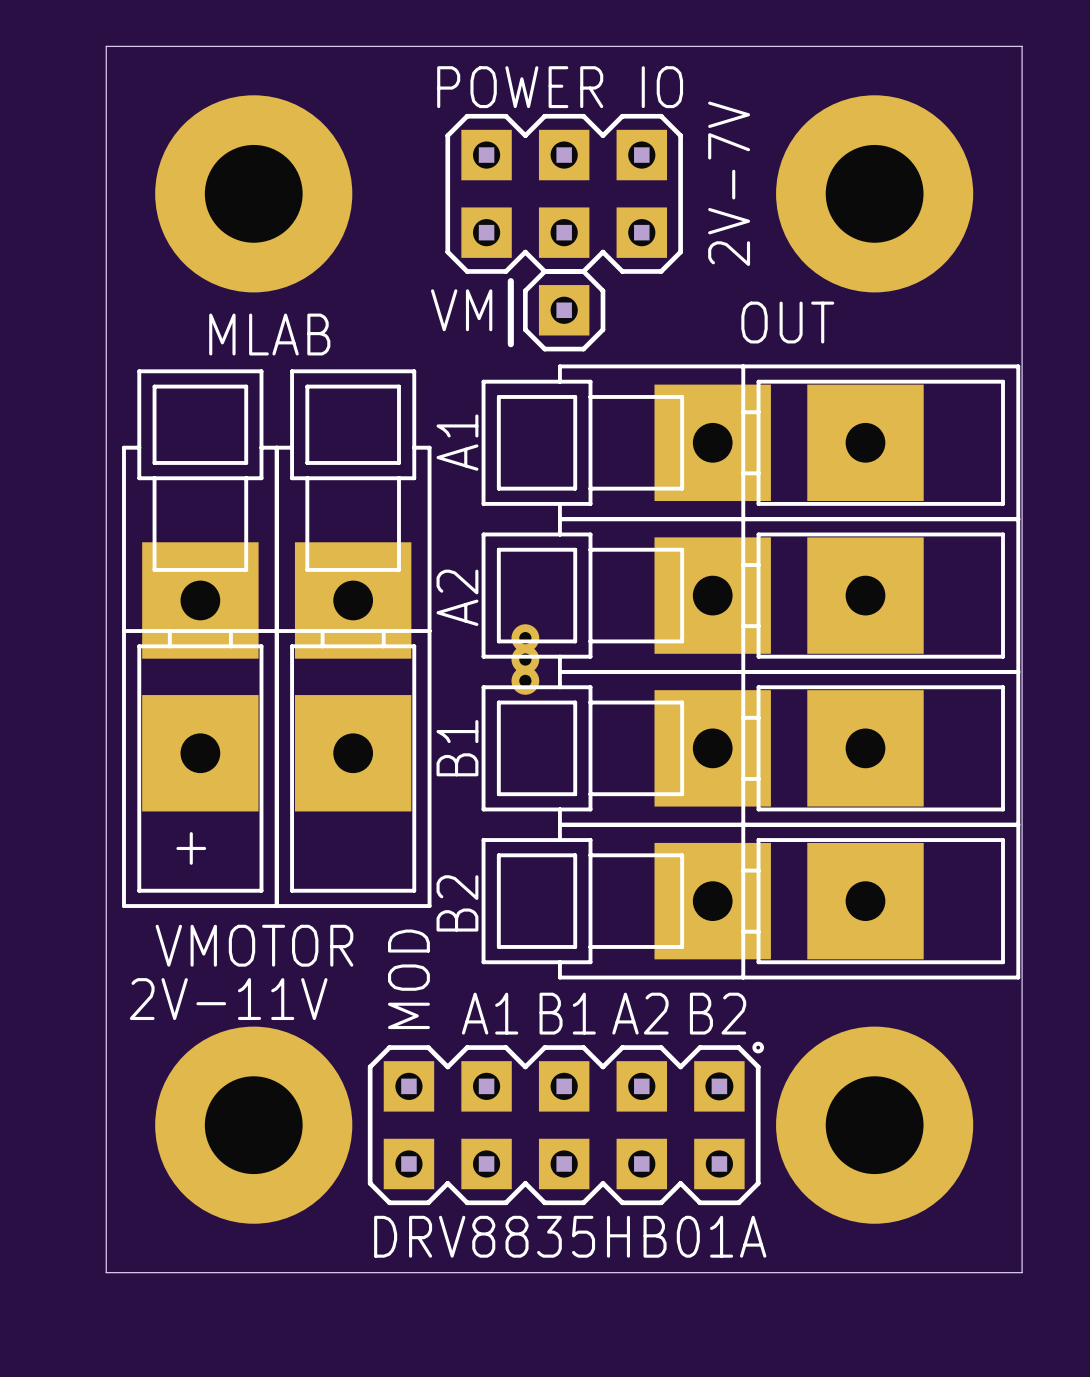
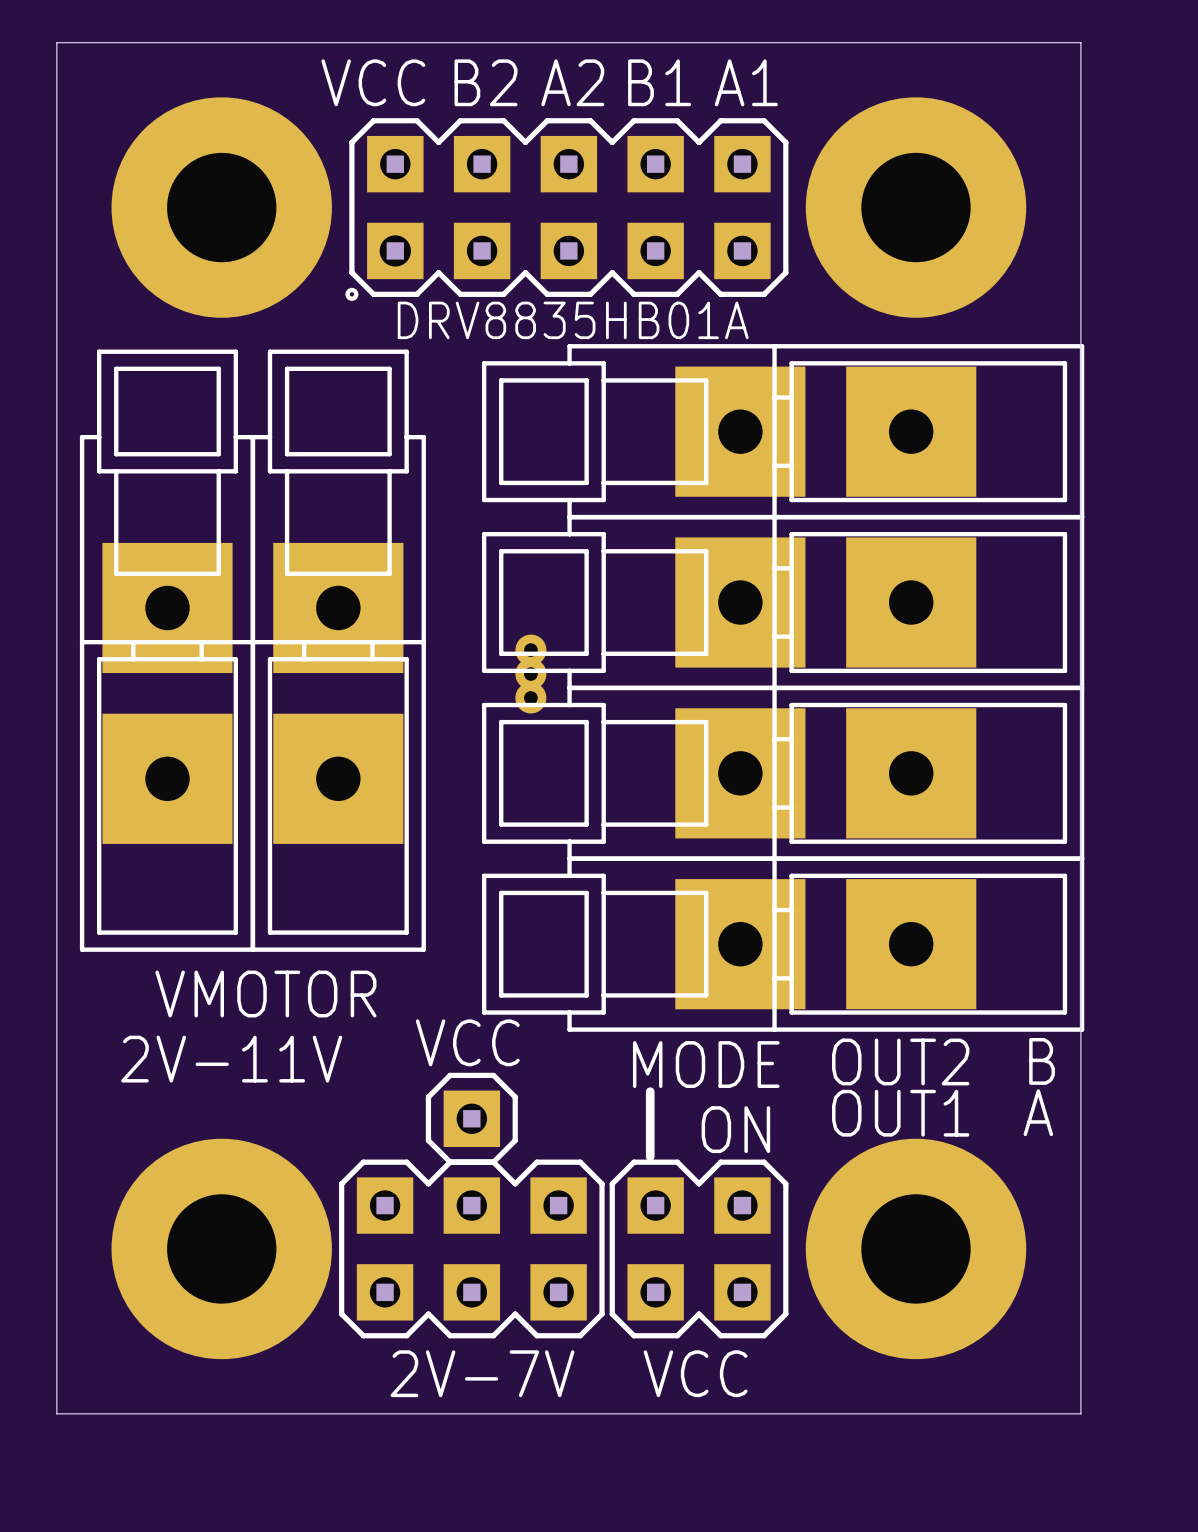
text: none -> VCC (373, 82)
text: none -> B2 (486, 82)
text: none -> A2 (572, 82)
text: none -> B1 (659, 82)
text: POWER IO (560, 87) -> none
part footprint: [445, 113, 683, 274] -> [345, 118, 789, 301]
text: 2V-7V (729, 183) -> none
line: (510, 281) (510, 344) -> none
text: none -> DRV8835HB01A (573, 320)
text: VM (461, 310) -> none
part position: (564, 310) -> (471, 1118)
text: OUT (787, 322) -> none
text: MLAB (269, 334) -> none
text rotation: 0° (457, 442) -> 90° clockwise (746, 82)
text position: A1 (457, 442) -> A1 (746, 82)
part position: (750, 442) -> (783, 431)
part position: (750, 595) -> (783, 602)
text: A2 (457, 597) -> none
part position: (200, 638) -> (167, 650)
part position: (353, 638) -> (338, 650)
part position: (525, 659) -> (530, 674)
text: B1 (457, 748) -> none
part position: (750, 748) -> (783, 773)
text: + (191, 848) -> none
part position: (750, 901) -> (783, 944)
text: B2 (457, 903) -> none
text: none -> VCC (467, 1042)
text position: VMOTOR (254, 945) -> VMOTOR (265, 994)
text: none -> OUT2 (900, 1061)
text: none -> B (1042, 1061)
text: MOD (408, 979) -> none
line: none -> (650, 1091) (650, 1156)
text position: 2V-11V (228, 999) -> 2V-11V (231, 1059)
text: none -> OUT1 (900, 1113)
text: none -> A (1038, 1112)
text: A1 (490, 1013) -> none
text: B1 (567, 1013) -> MODE (706, 1064)
text: A2 (640, 1013) -> none
text: B2 (718, 1013) -> none
text: none -> ON (735, 1129)
part: (565, 1123) -> none
part: none -> (471, 1248)
part: none -> (699, 1248)
text: none -> 2V-7V (482, 1373)
text: DRV8835HB01A (570, 1236) -> none
text: none -> VCC (695, 1373)

